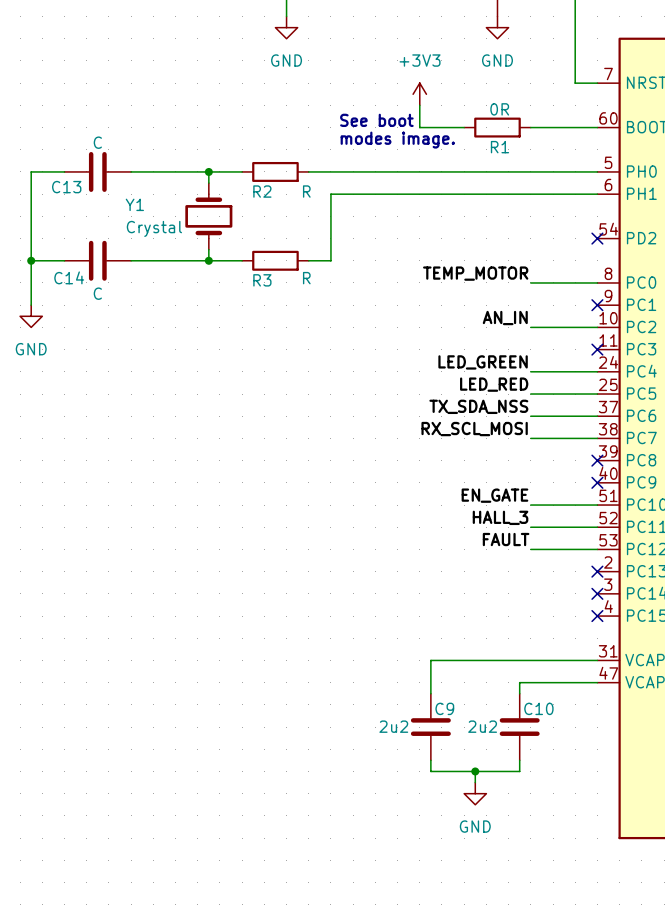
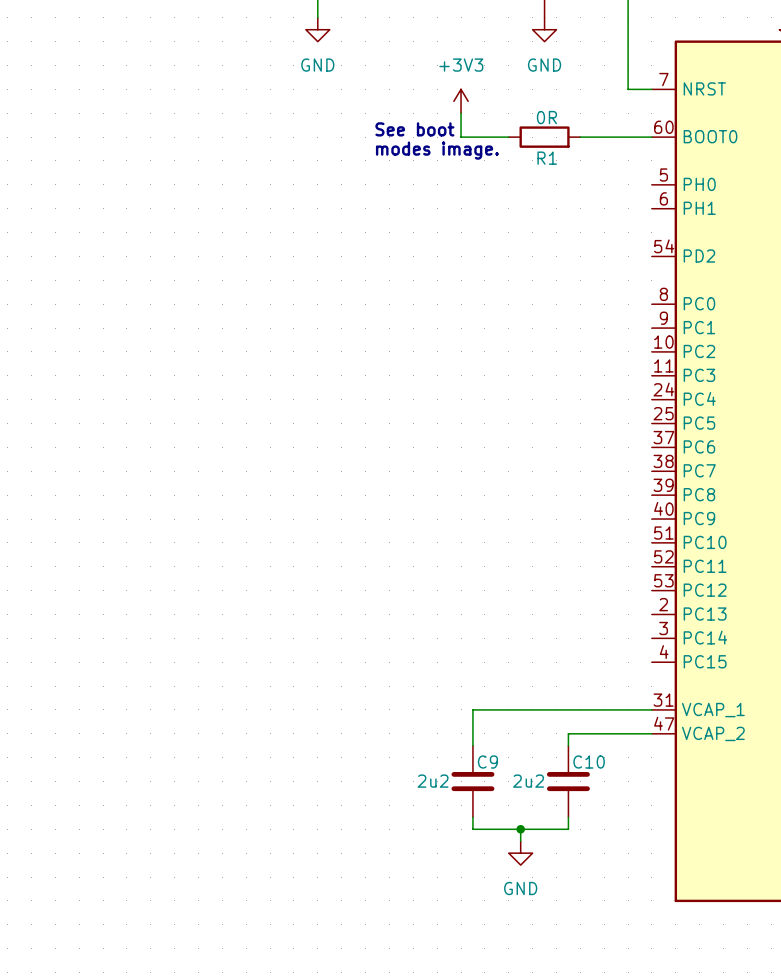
wire: (64, 171) (31, 171) (31, 305) -> none
C13: C (97, 171) -> none
wire: (131, 171) (242, 171) -> none
wire: (208, 171) (208, 183) -> none
junction: (208, 171) -> none
R2: R (275, 171) -> none
wire: (308, 171) (597, 171) -> none
wire: (597, 194) (330, 194) (330, 260) (308, 260) -> none
Y1: Crystal (208, 216) -> none
no-connect mark: (597, 238) -> none
wire: (208, 249) (208, 260) -> none
wire: (31, 260) (64, 260) -> none
junction: (31, 260) -> none
C14: C (97, 260) -> none
wire: (131, 260) (242, 260) -> none
junction: (208, 260) -> none
R3: R (275, 260) -> none
label: TEMP_MOTOR (475, 273) -> none
wire: (530, 282) (597, 282) -> none
no-connect mark: (597, 305) -> none
power symbol: GND (31, 316) -> none
label: AN_IN (505, 318) -> none
wire: (530, 327) (597, 327) -> none
no-connect mark: (597, 349) -> none
label: LED_GREEN (483, 362) -> none
wire: (530, 371) (597, 371) -> none
label: LED_RED (494, 384) -> none
wire: (530, 394) (597, 394) -> none
label: TX_SDA_NSS (478, 406) -> none
wire: (530, 416) (597, 416) -> none
label: RX_SCL_MOSI (474, 429) -> none
wire: (530, 438) (597, 438) -> none
no-connect mark: (597, 460) -> none
no-connect mark: (597, 482) -> none
label: EN_GATE (494, 495) -> none
wire: (530, 505) (597, 505) -> none
label: HALL_3 (500, 517) -> none
wire: (530, 527) (597, 527) -> none
label: FAULT (506, 539) -> none
wire: (530, 549) (597, 549) -> none
no-connect mark: (597, 571) -> none
no-connect mark: (597, 593) -> none
no-connect mark: (597, 616) -> none

